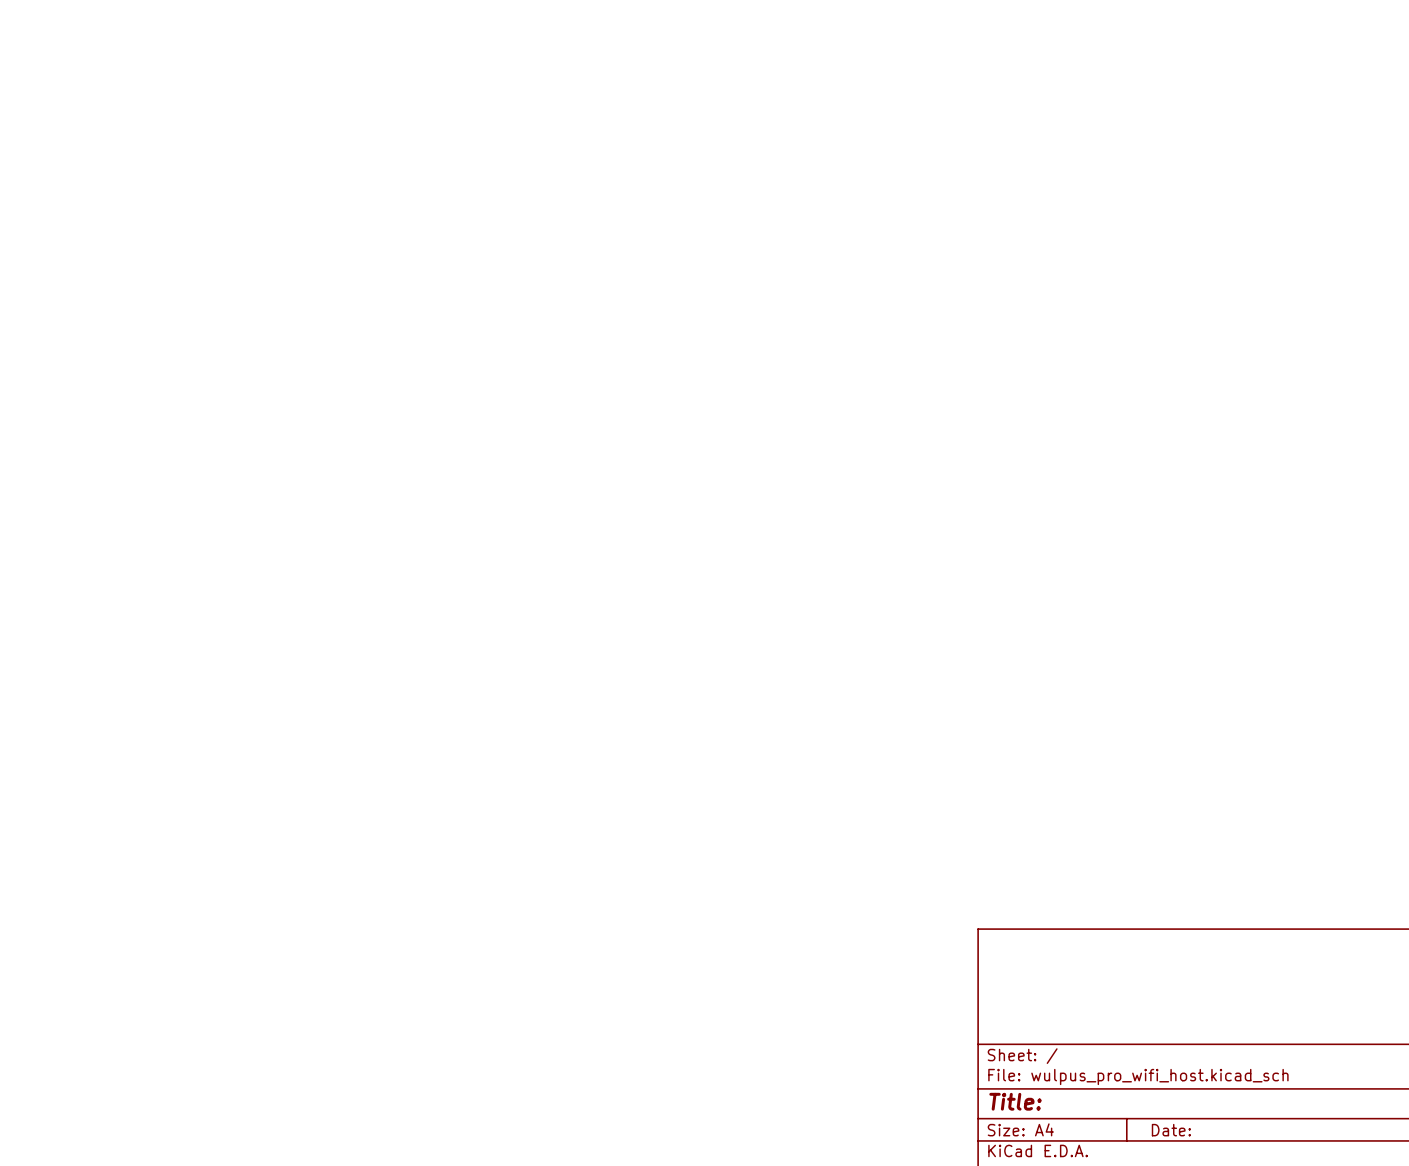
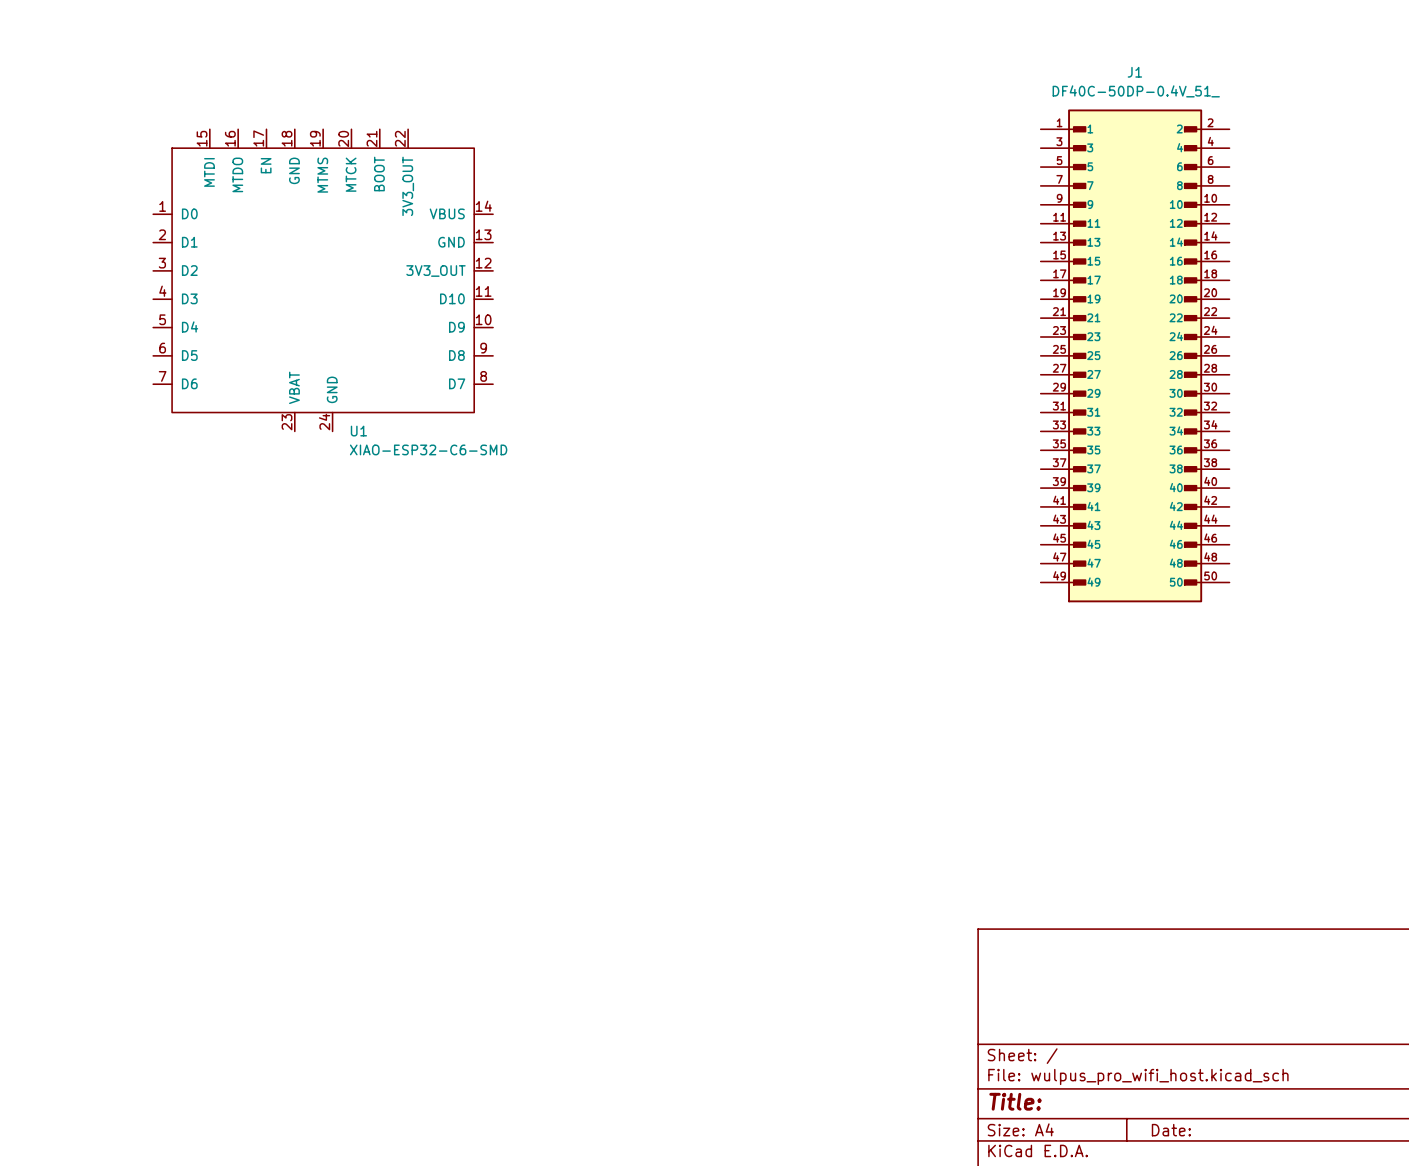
U1: none -> XIAO-ESP32-C6-SMD (323, 280)
J1: none -> DF40C-50DP-0.4V_51_ (1135, 355)

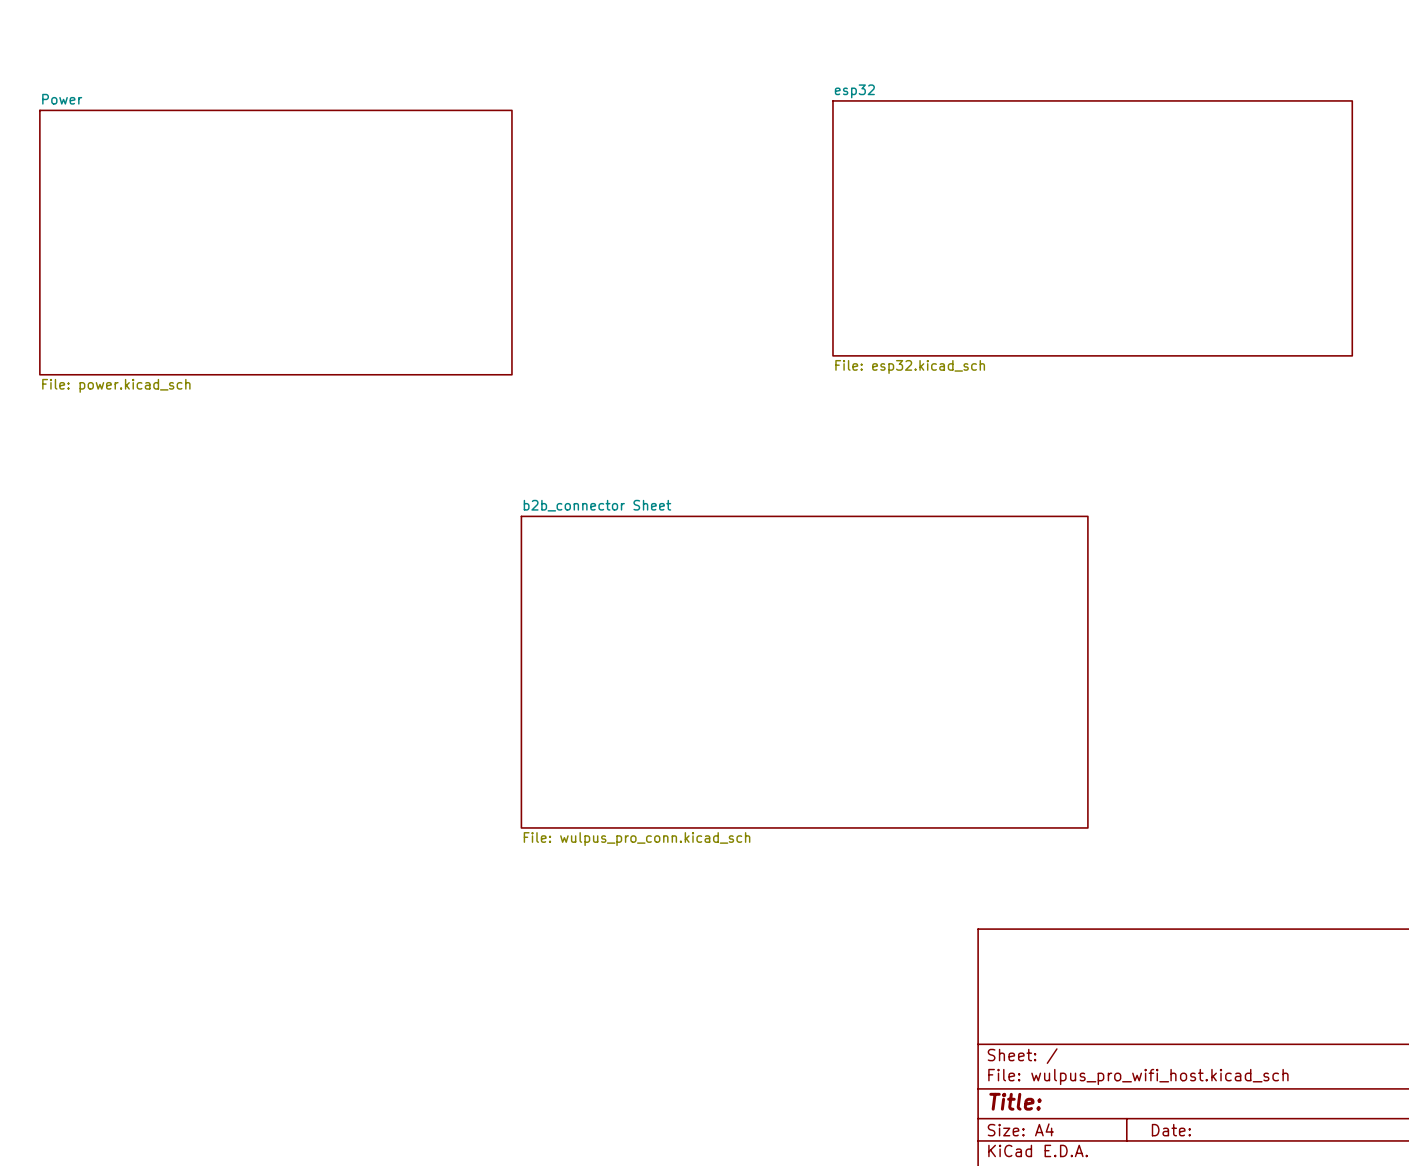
sheet esp32: none -> File: esp32.kicad_sch (1092, 228)
sheet Power: none -> File: power.kicad_sch (275, 242)
U1: XIAO-ESP32-C6-SMD (323, 280) -> none
J1: DF40C-50DP-0.4V_51_ (1135, 355) -> none
sheet b2b_connector Sheet: none -> File: wulpus_pro_conn.kicad_sch (804, 672)

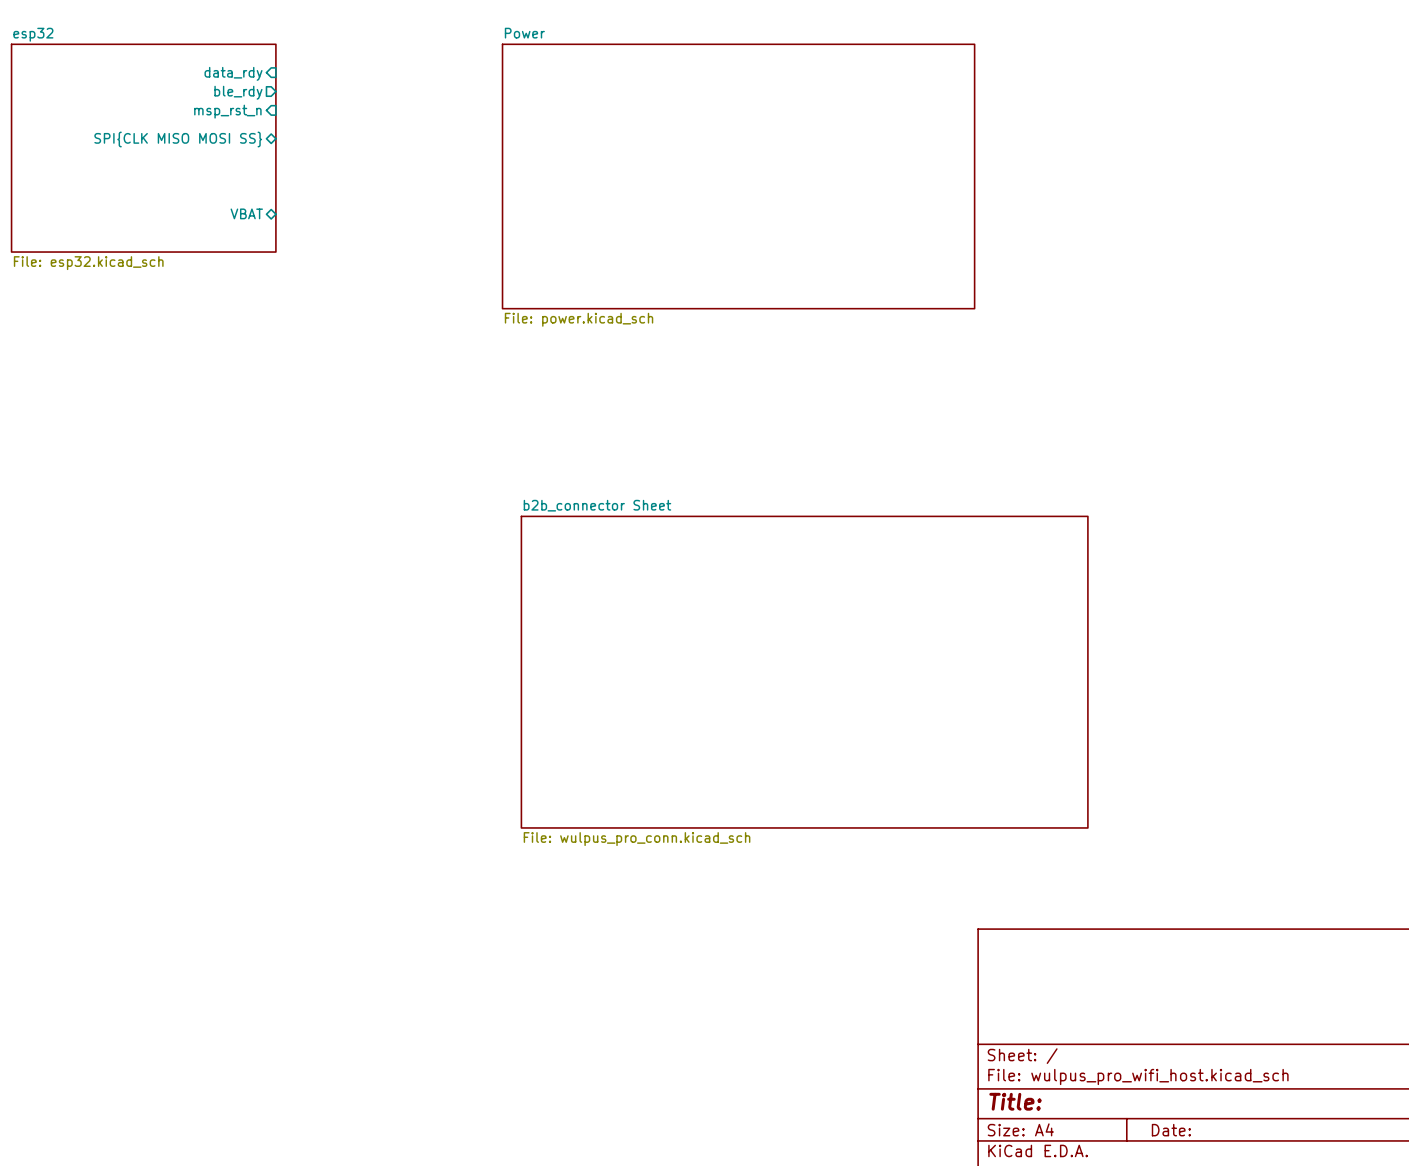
sheet pin: none -> data_rdy (233, 73)
sheet esp32 name position: esp32 (854, 91) -> esp32 (33, 34)
sheet pin: none -> ble_rdy (238, 92)
sheet esp32 shape: [832, 100, 1353, 357] -> [10, 43, 277, 253]
sheet pin: none -> msp_rst_n (227, 111)
sheet pin: none -> SPI{CLK MISO MOSI SS} (178, 139)
sheet Power: none -> File: power.kicad_sch (738, 176)
sheet pin: none -> VBAT (246, 213)
sheet Power: File: power.kicad_sch (275, 242) -> none
sheet esp32 value position: File: esp32.kicad_sch (910, 366) -> File: esp32.kicad_sch (88, 263)

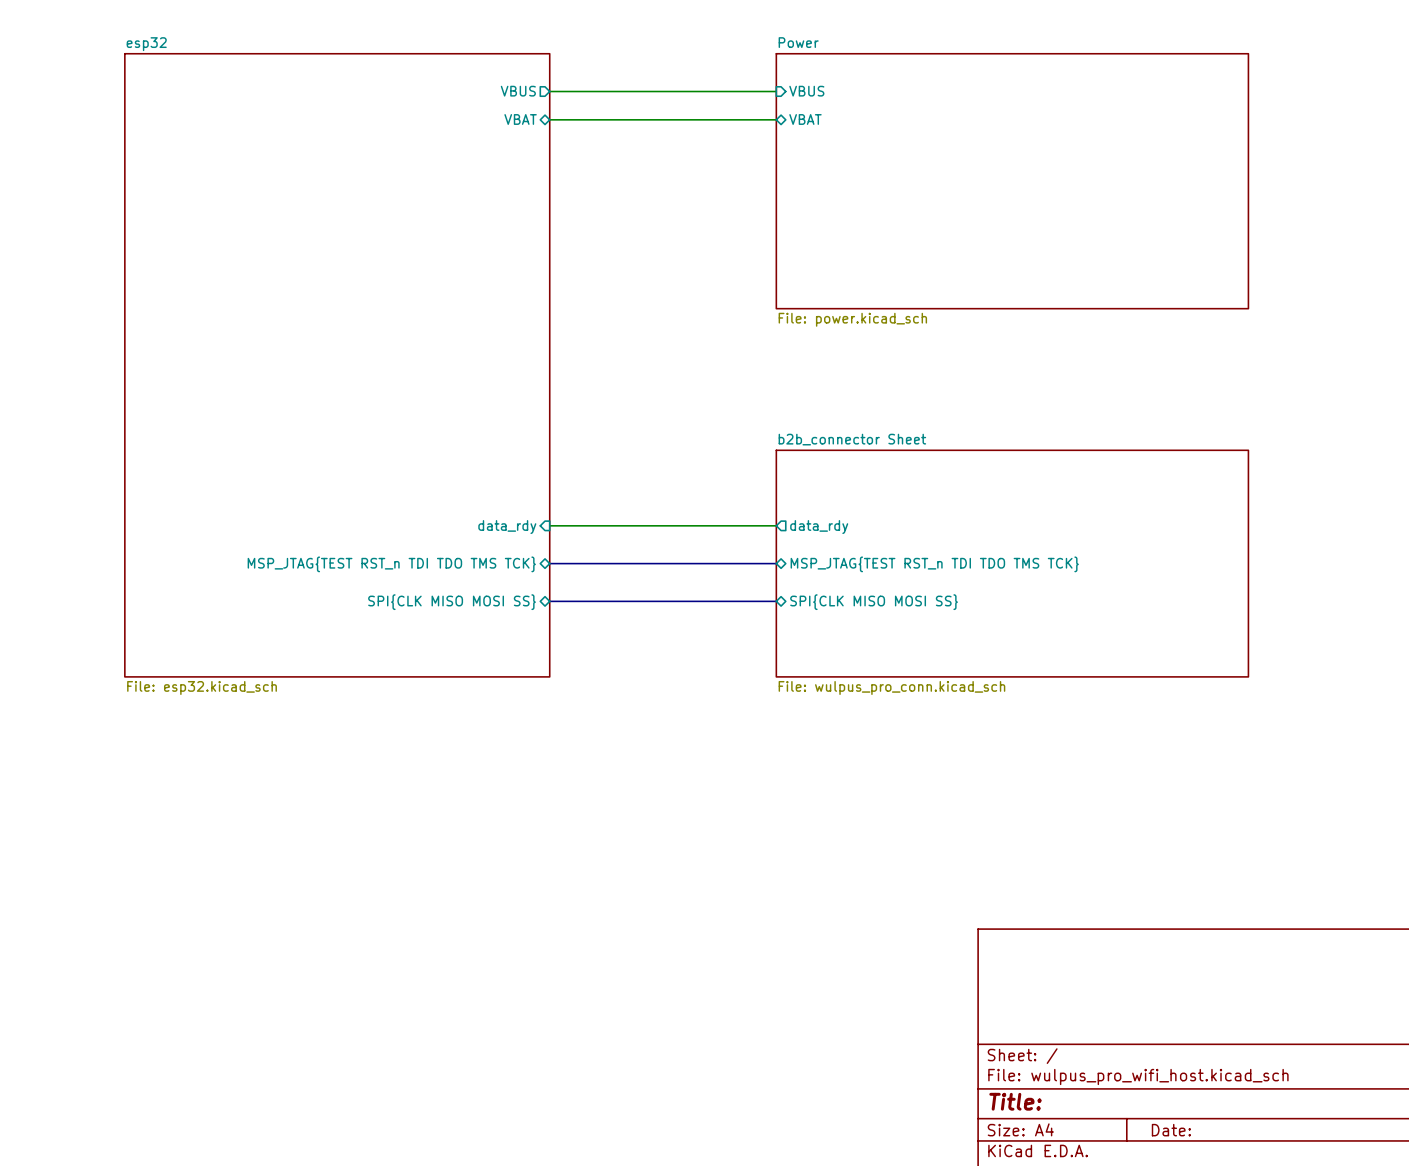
sheet esp32 name position: esp32 (33, 34) -> esp32 (146, 44)
sheet esp32 shape: [10, 43, 277, 253] -> [124, 53, 551, 678]
sheet pin: data_rdy (233, 73) -> none
sheet pin: none -> VBUS (518, 91)
wire: none -> (549, 91) (776, 91)
sheet pin: none -> VBUS (806, 91)
sheet pin: ble_rdy (238, 92) -> none
sheet pin: msp_rst_n (227, 111) -> none
sheet pin: none -> VBAT (520, 119)
wire: none -> (549, 119) (776, 119)
sheet pin: none -> VBAT (805, 119)
sheet pin: SPI{CLK MISO MOSI SS} (178, 139) -> none
sheet Power: File: power.kicad_sch (738, 176) -> none
sheet Power: none -> File: power.kicad_sch (1012, 181)
sheet pin: VBAT (246, 213) -> none
sheet esp32 value position: File: esp32.kicad_sch (88, 263) -> File: esp32.kicad_sch (202, 687)
sheet b2b_connector Sheet name position: b2b_connector Sheet (597, 505) -> b2b_connector Sheet (852, 439)
sheet b2b_connector Sheet shape: [520, 515, 1089, 829] -> [775, 449, 1249, 678]
wire: none -> (549, 525) (776, 525)
sheet pin: none -> data_rdy (507, 527)
sheet pin: none -> data_rdy (819, 527)
bus: none -> (549, 563) (776, 563)
sheet pin: none -> MSP_JTAG{TEST RST_n TDI TDO TMS TCK} (391, 564)
sheet pin: none -> MSP_JTAG{TEST RST_n TDI TDO TMS TCK} (934, 564)
bus: none -> (549, 601) (776, 601)
sheet pin: none -> SPI{CLK MISO MOSI SS} (452, 602)
sheet pin: none -> SPI{CLK MISO MOSI SS} (874, 602)
sheet b2b_connector Sheet value position: File: wulpus_pro_conn.kicad_sch (637, 839) -> File: wulpus_pro_conn.kicad_sch (891, 687)

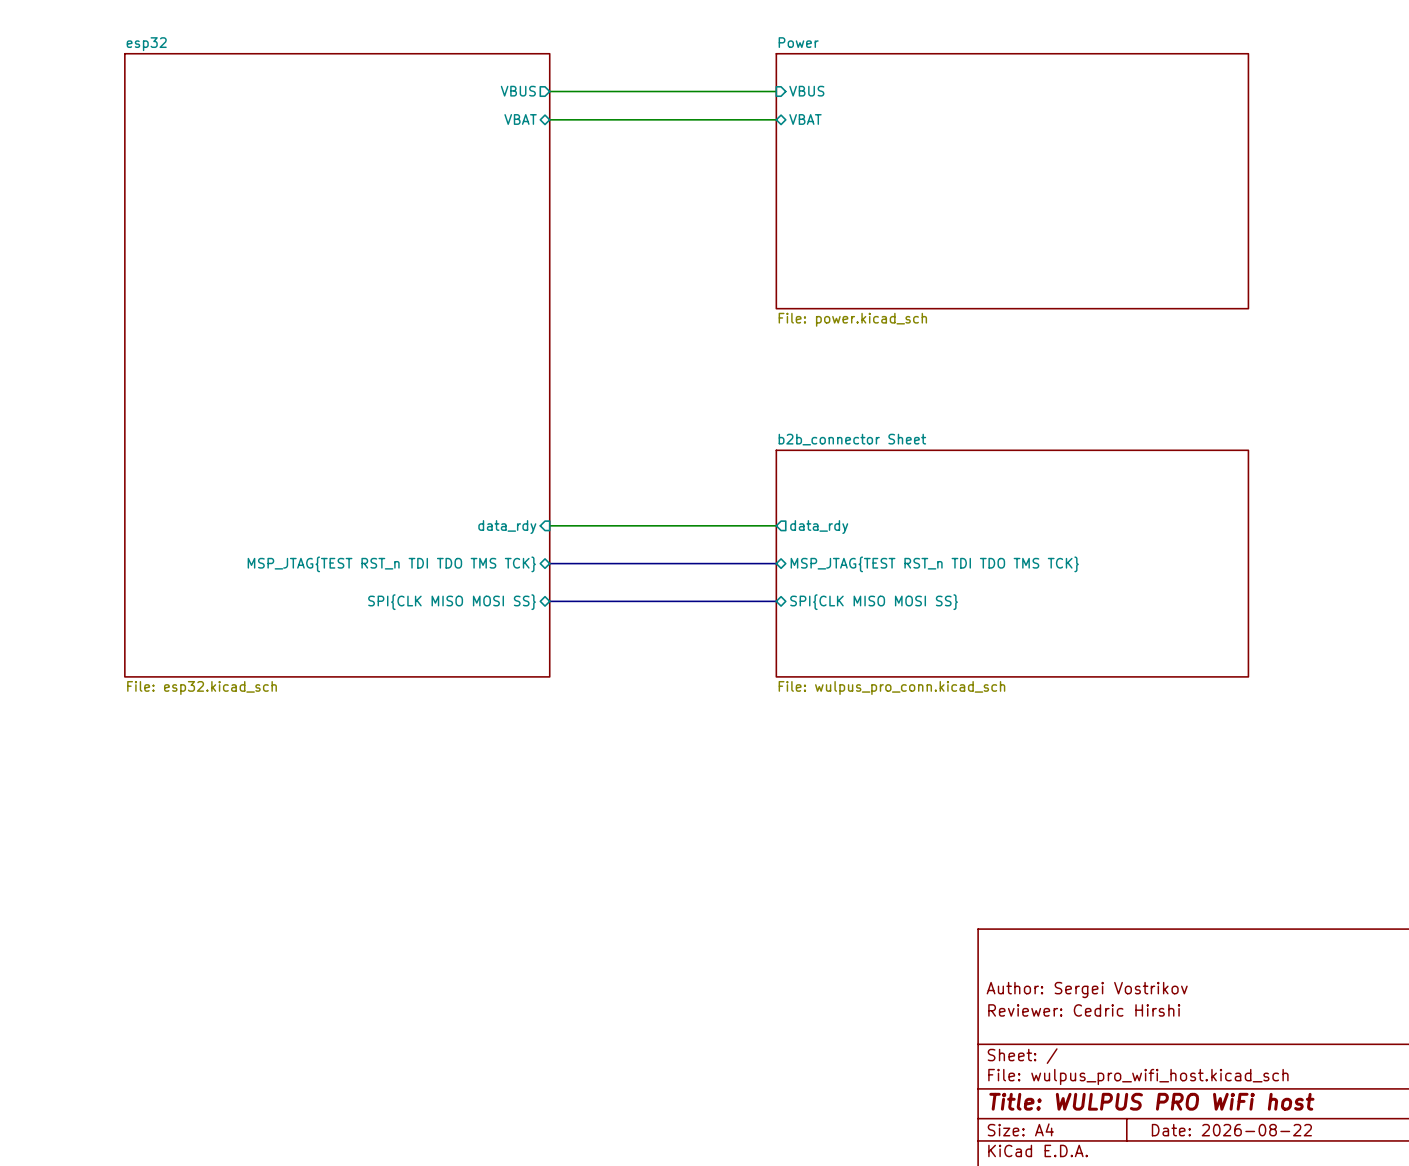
title block: none -> Author: Sergei Vostrikov (1087, 990)
title block: none -> Reviewer: Cedric Hirshi (1084, 1010)
title block: Title: (1015, 1101) -> Title: WULPUS PRO WiFi host (1151, 1101)
title block: Date: (1171, 1130) -> Date: 2026-08-22 (1231, 1130)

